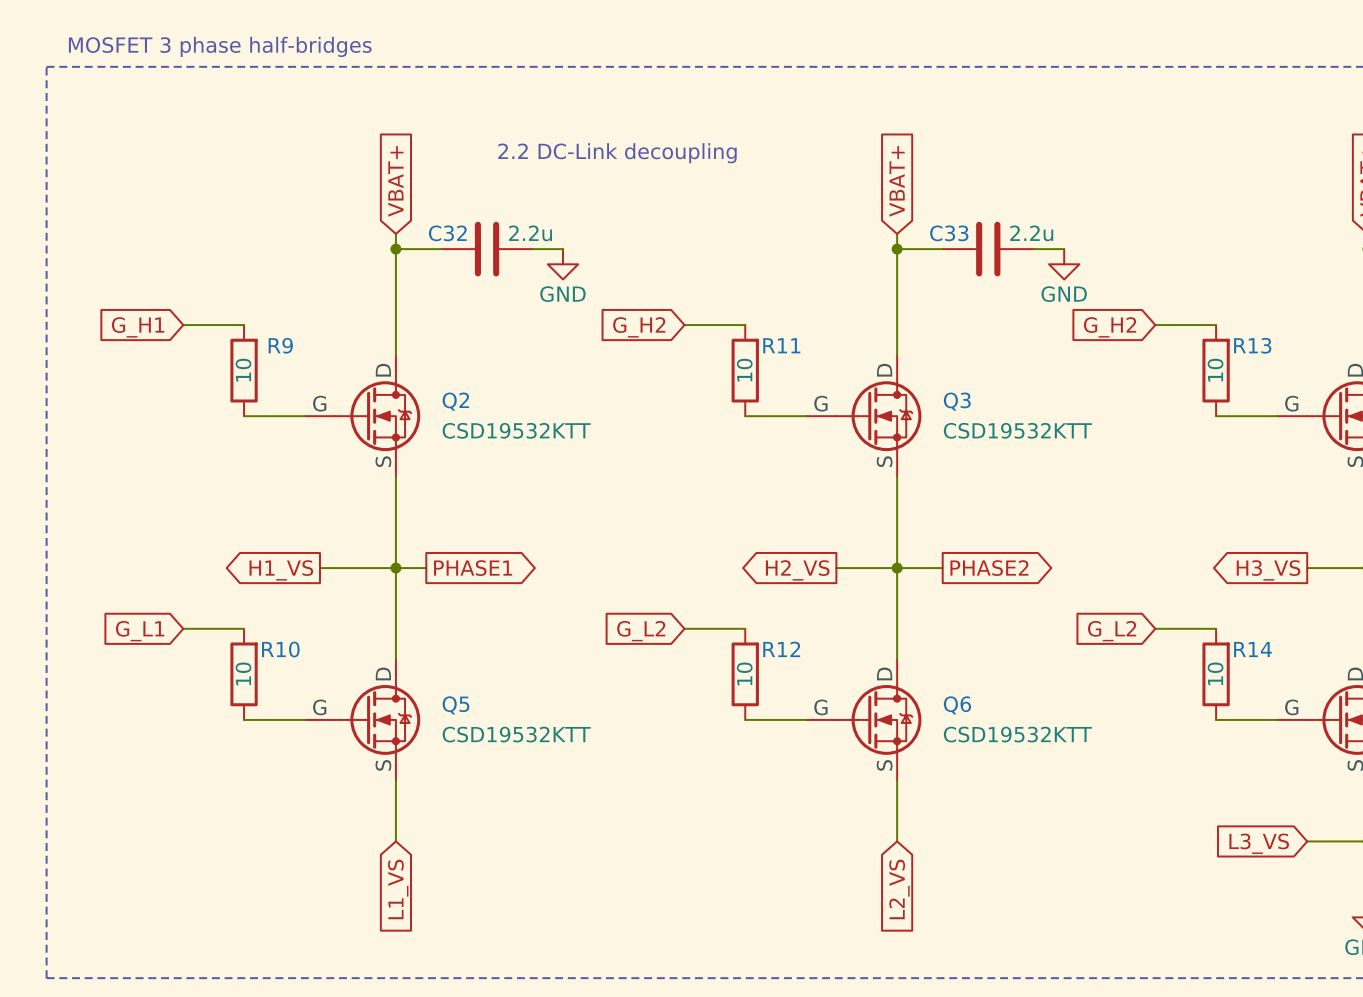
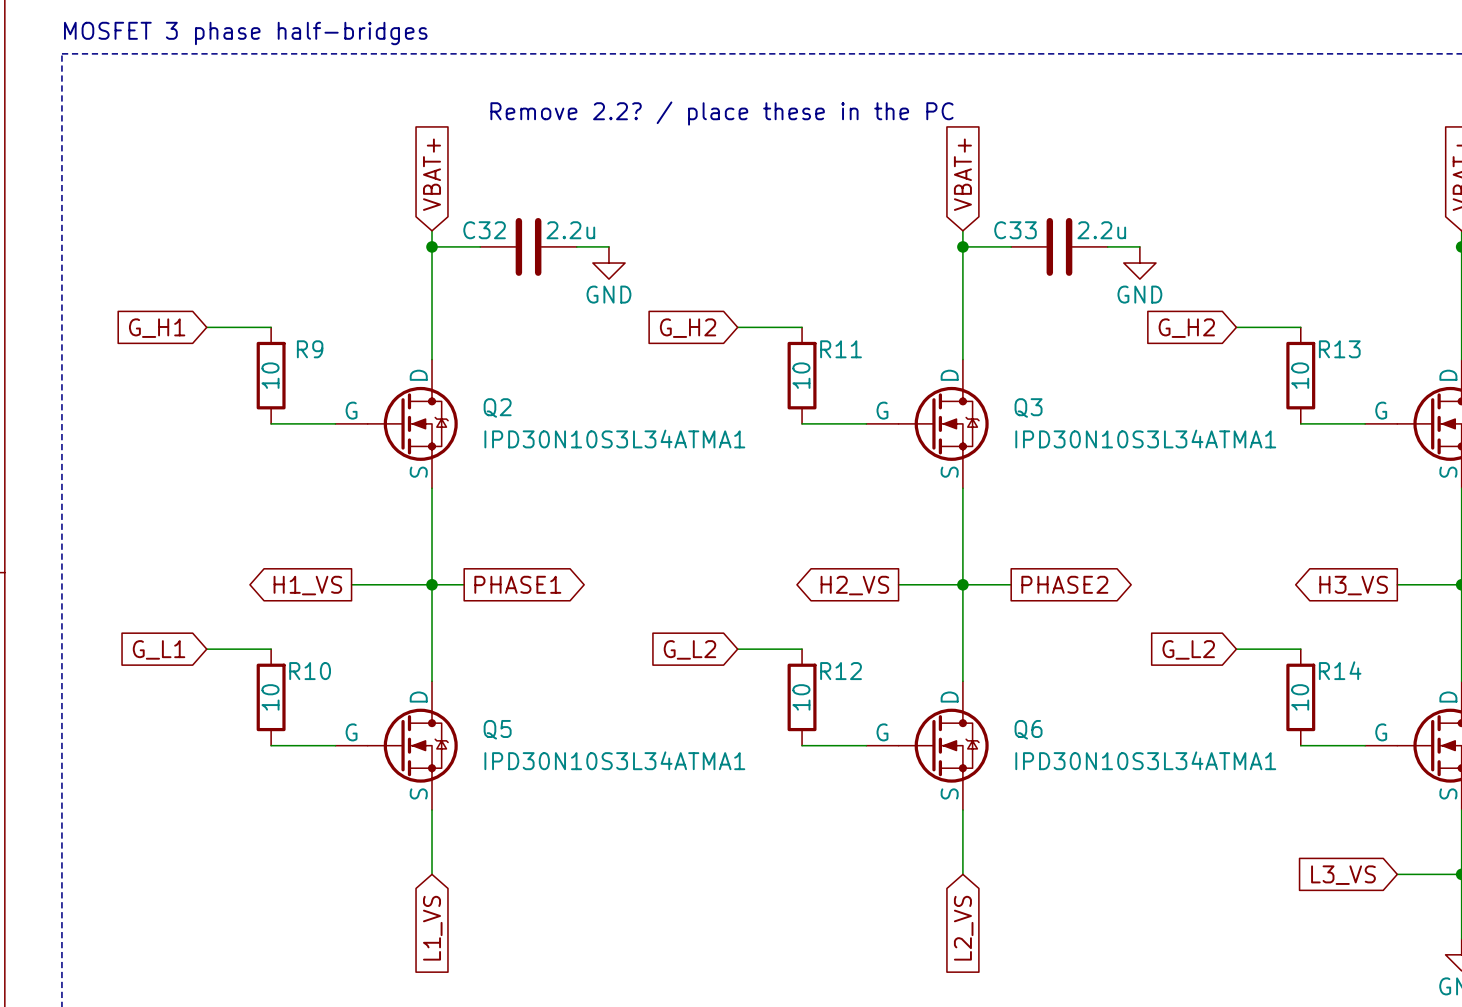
text: none -> Remove 2.2? / place these in the PC (721, 113)
text: 2.2 DC-Link decoupling (617, 153) -> none
Q2 value: CSD19532KTT (516, 430) -> IPD30N10S3L34ATMA1 (614, 439)
Q3 value: CSD19532KTT (1017, 430) -> IPD30N10S3L34ATMA1 (1145, 439)
Q5 value: CSD19532KTT (516, 734) -> IPD30N10S3L34ATMA1 (614, 760)
Q6 value: CSD19532KTT (1017, 734) -> IPD30N10S3L34ATMA1 (1145, 760)

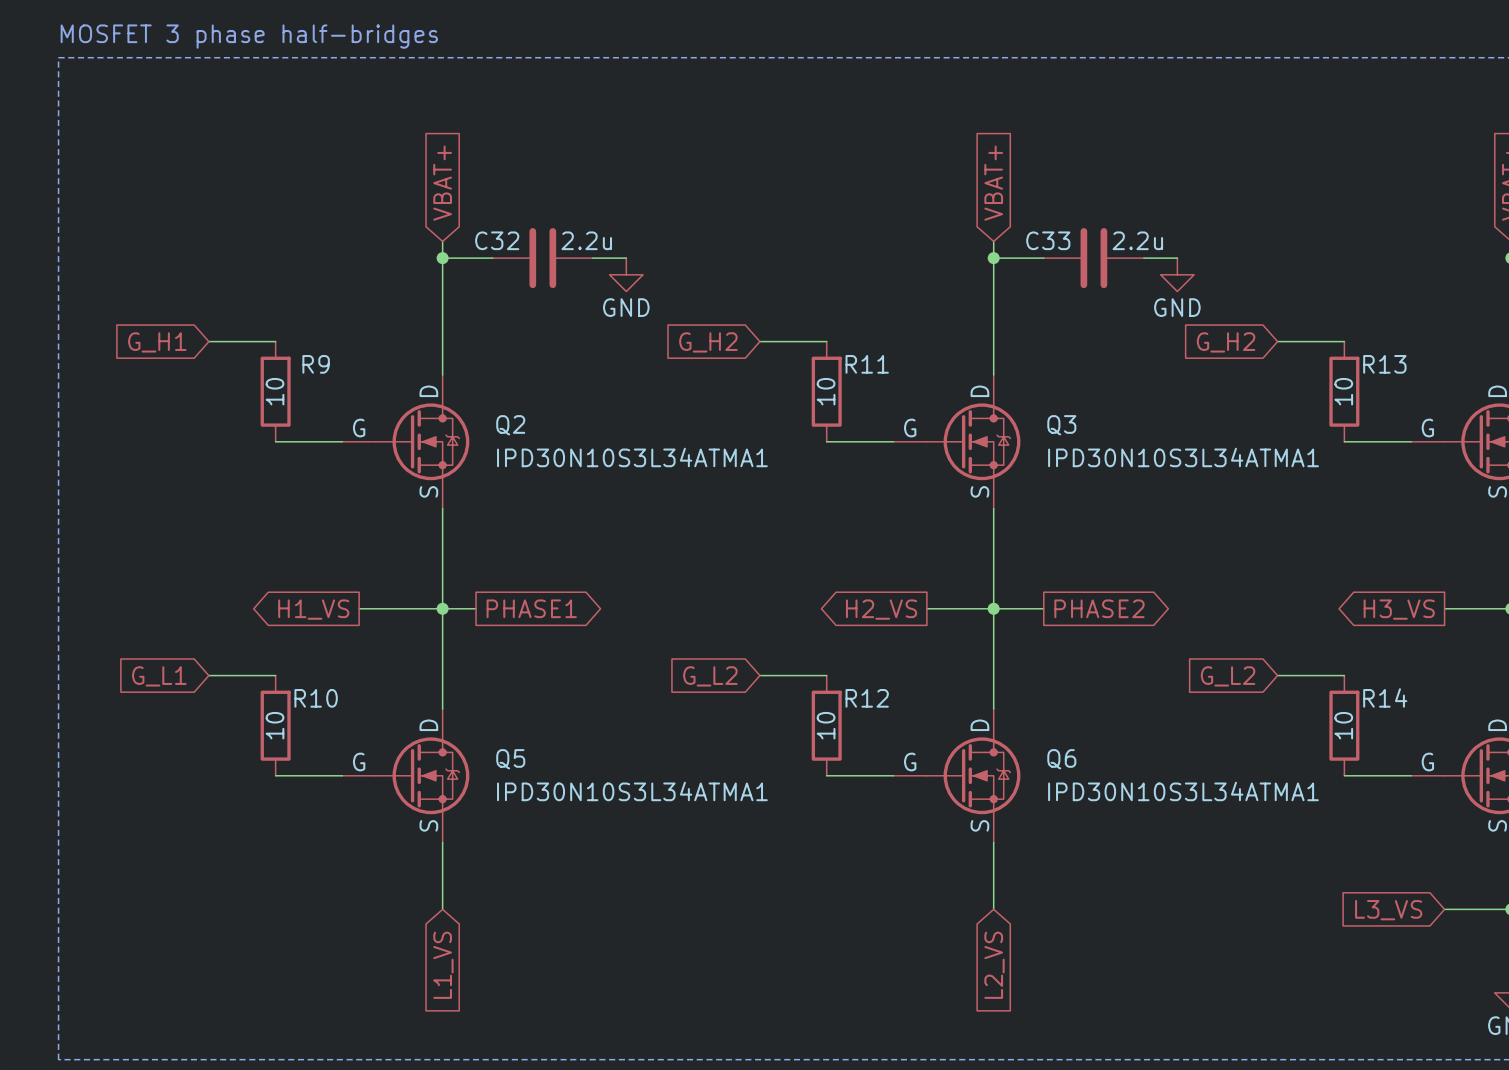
text: Remove 2.2? / place these in the PC (721, 113) -> none

